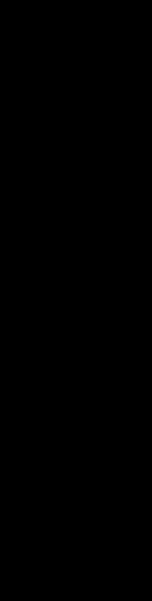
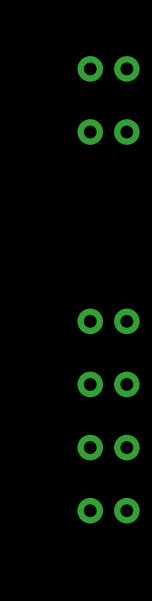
part: none -> (108, 68)
part: none -> (108, 132)
part: none -> (108, 321)
part: none -> (108, 384)
part: none -> (108, 447)
part: none -> (108, 510)

